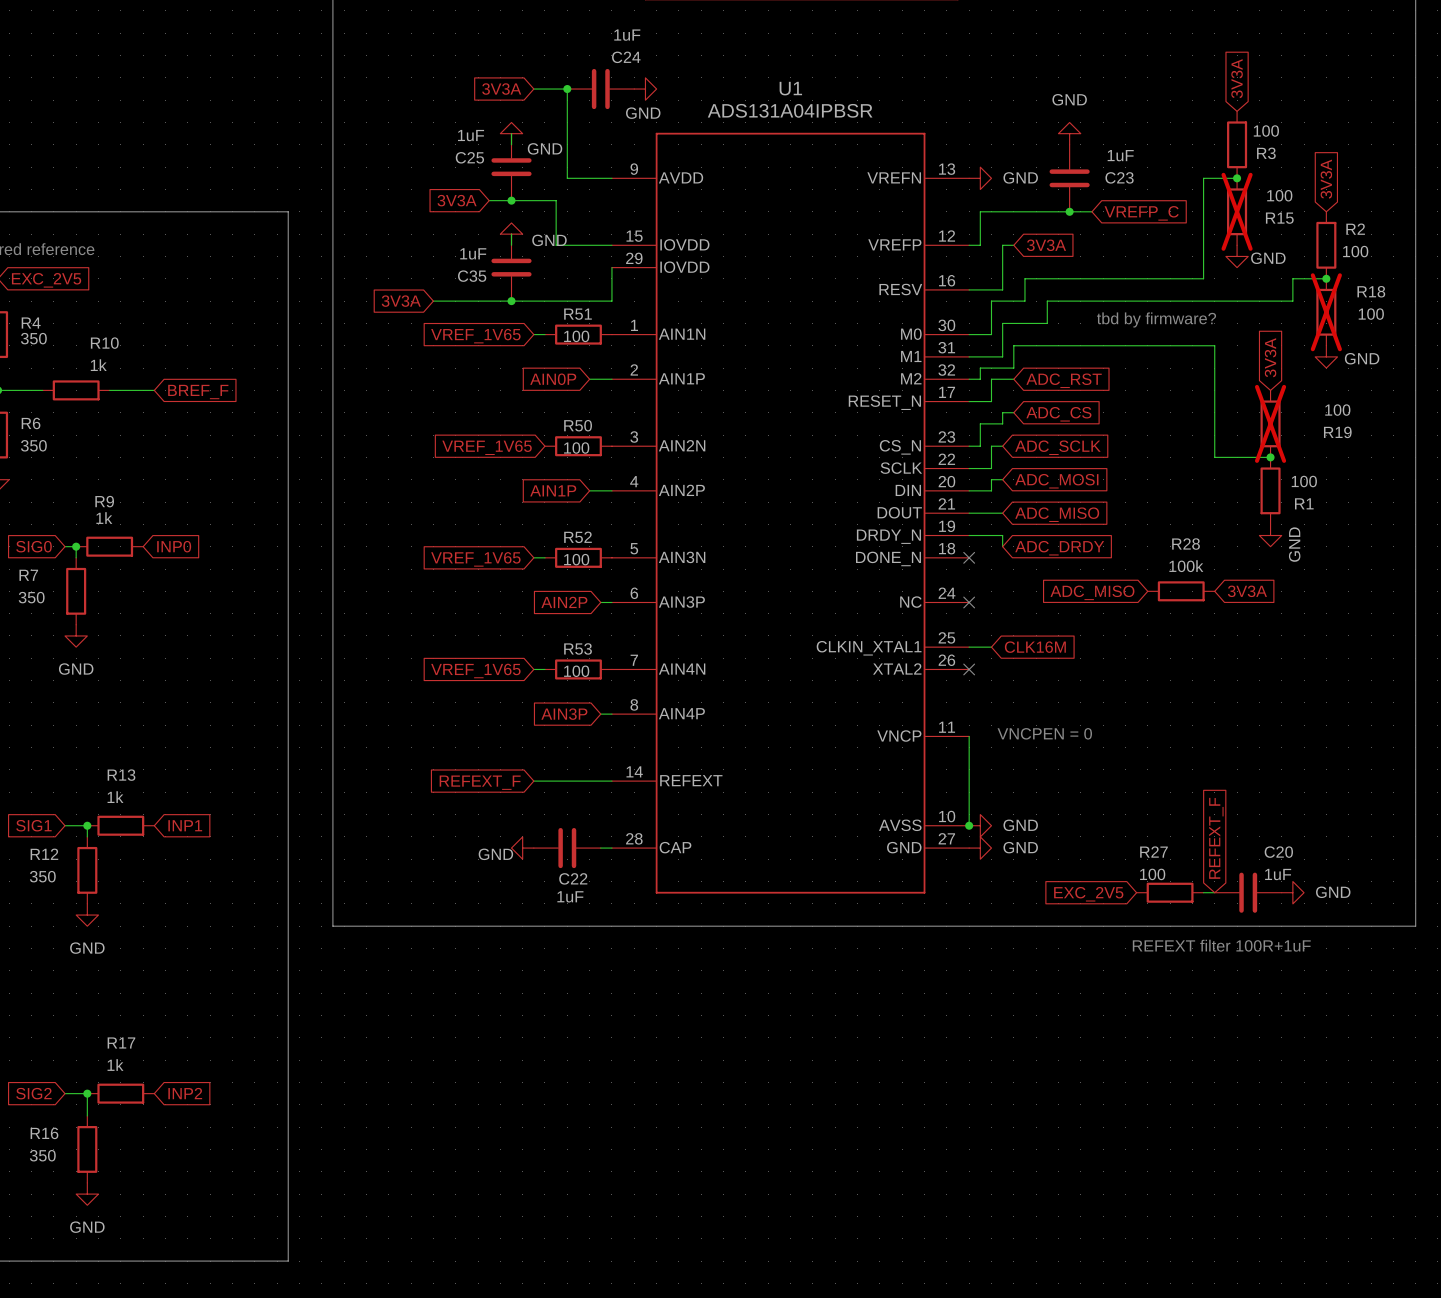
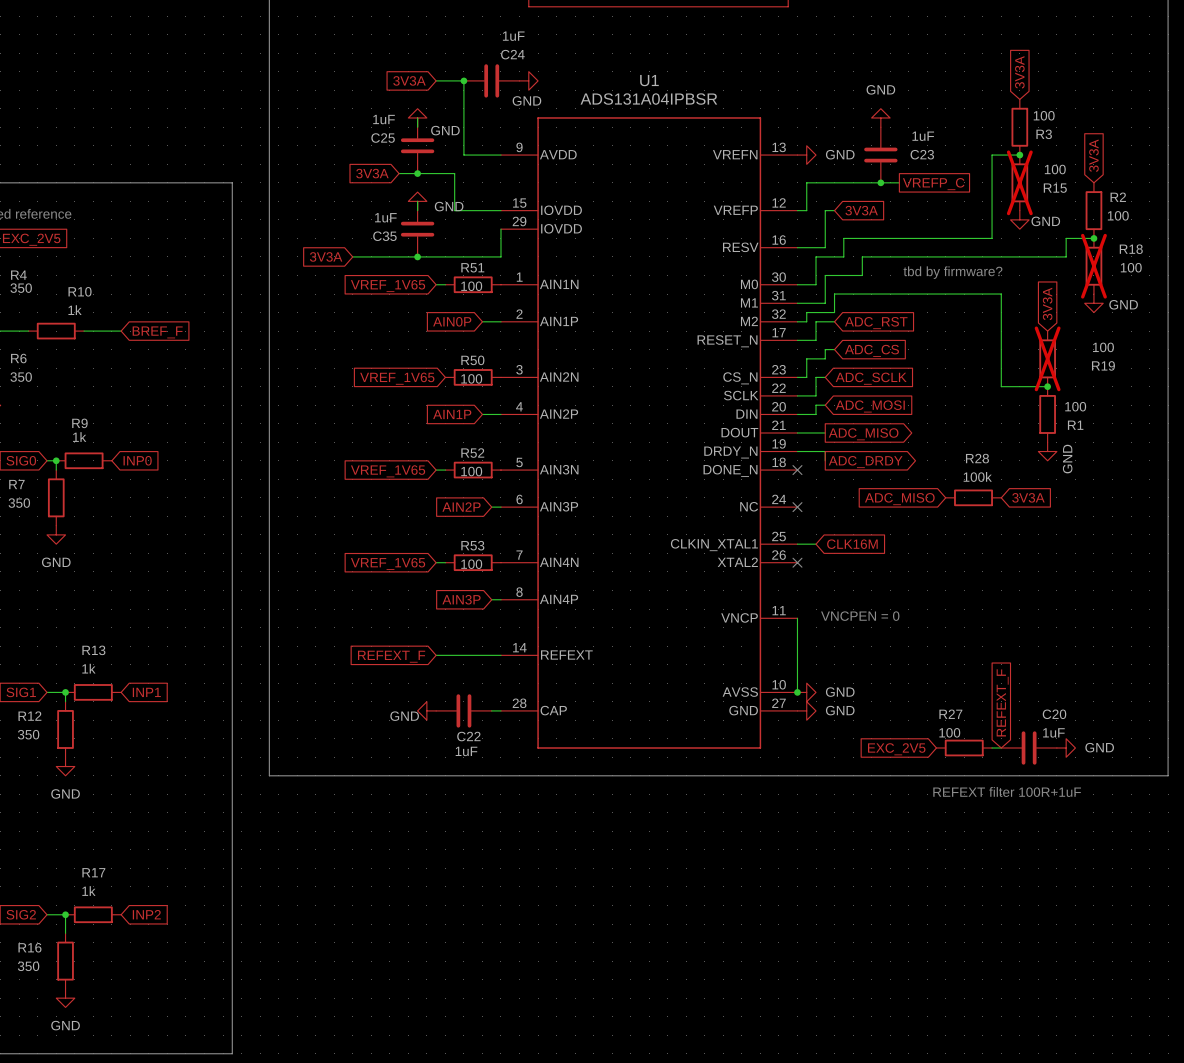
global label shape: input (1141, 213) -> passive (933, 184)
global label shape: input (1057, 514) -> output (863, 434)
global label shape: input (1059, 548) -> output (865, 462)

